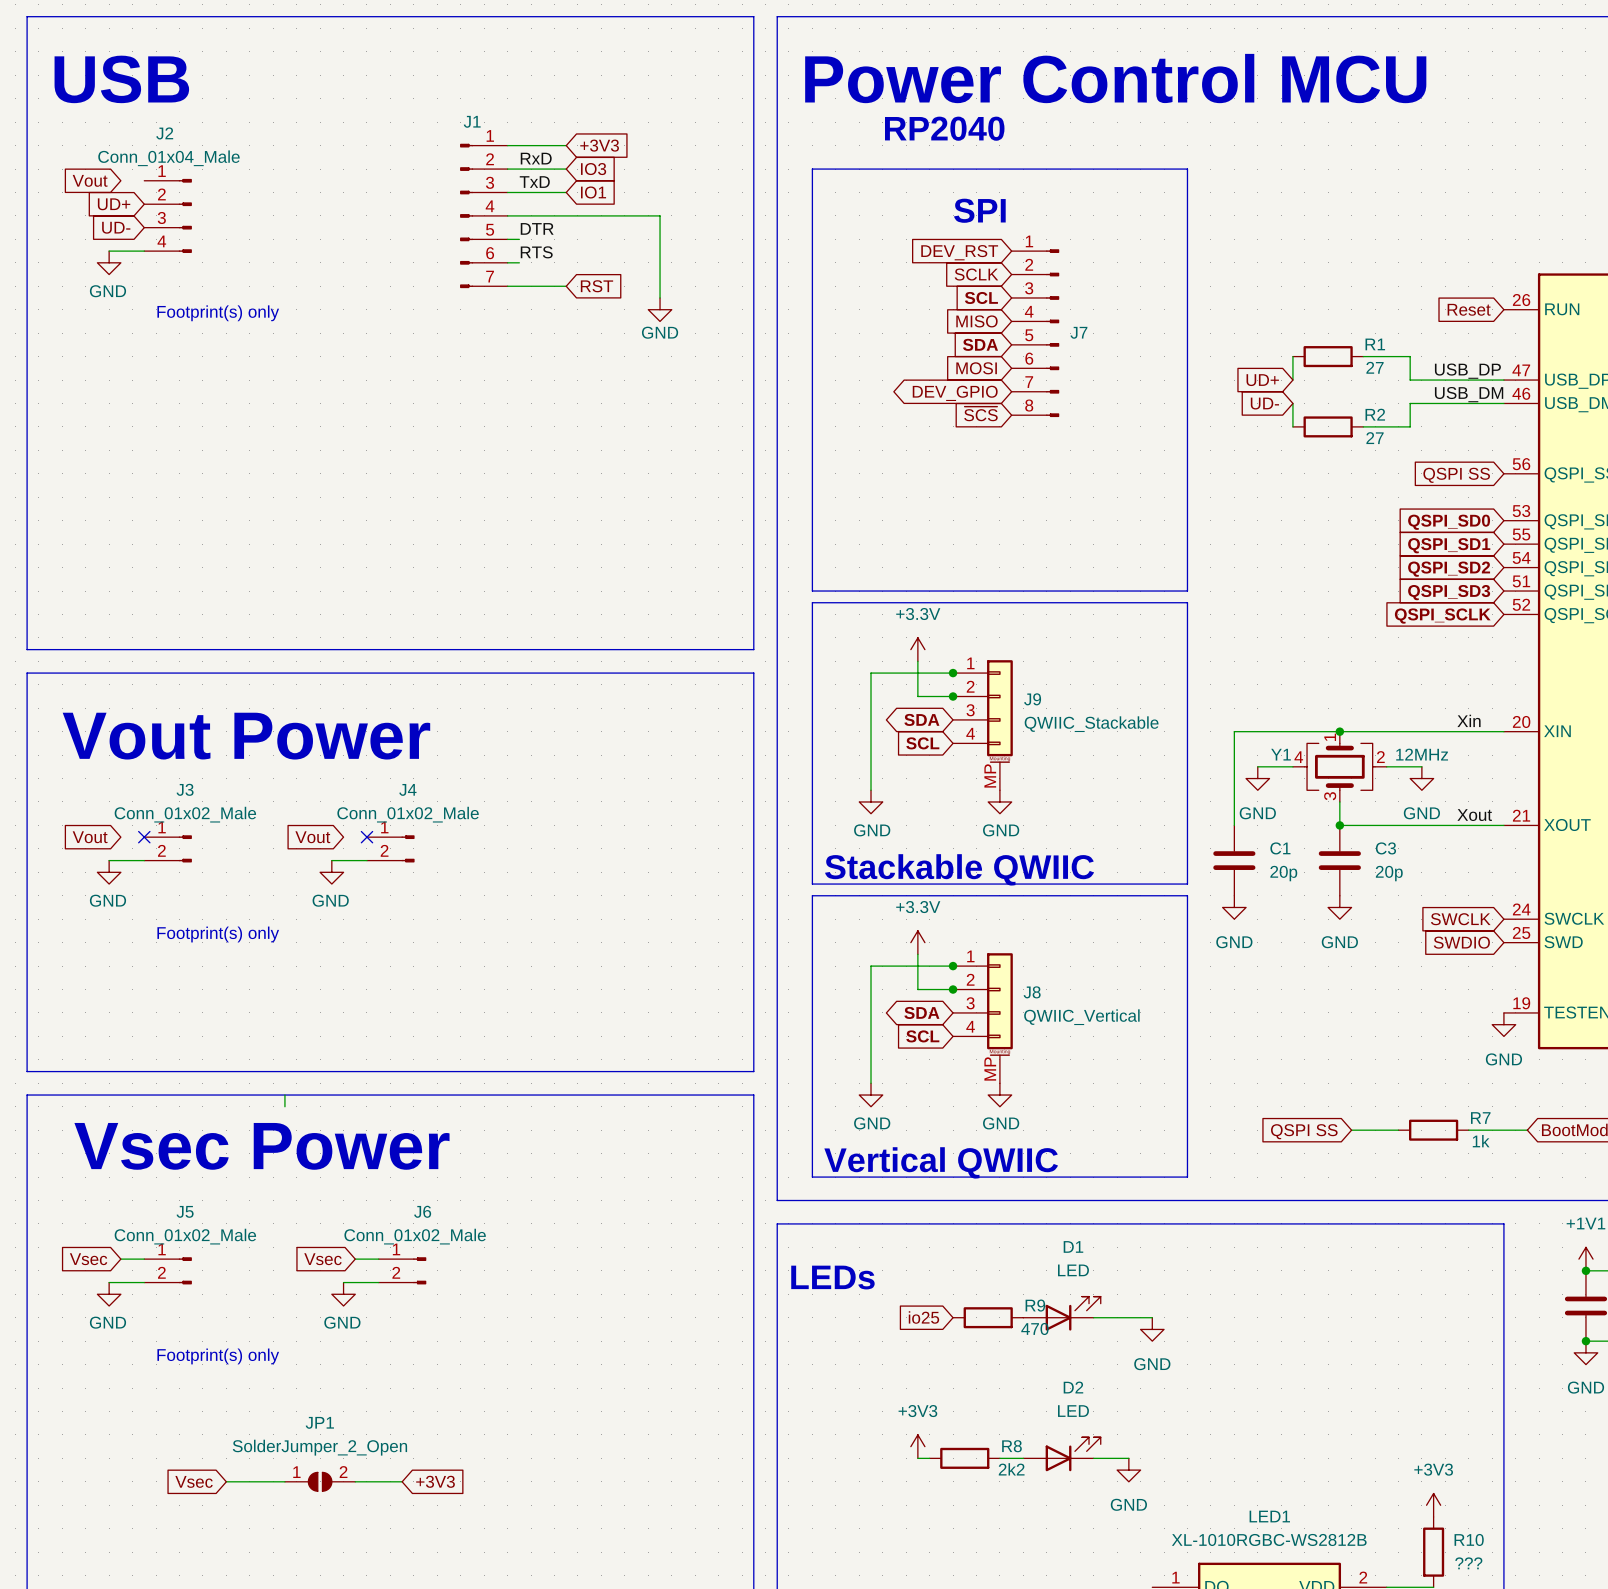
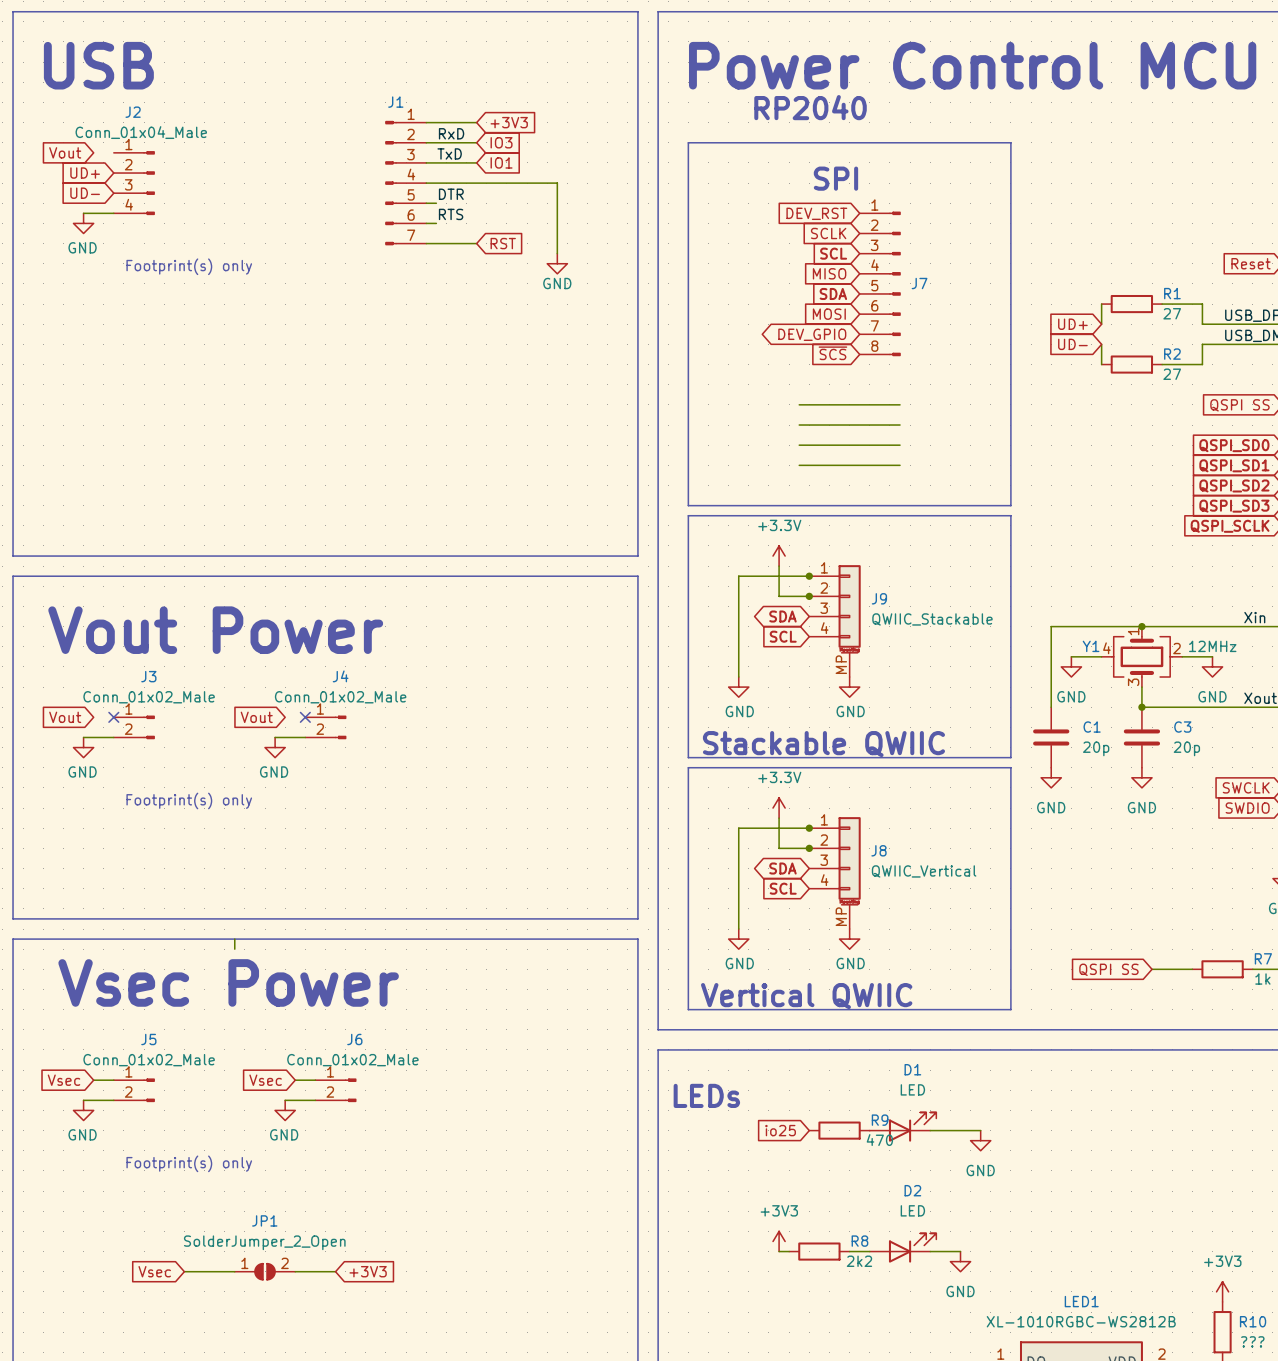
wire: none -> (799, 404) (900, 404)
wire: none -> (799, 425) (900, 425)
wire: none -> (799, 445) (900, 445)
wire: none -> (799, 465) (900, 465)

